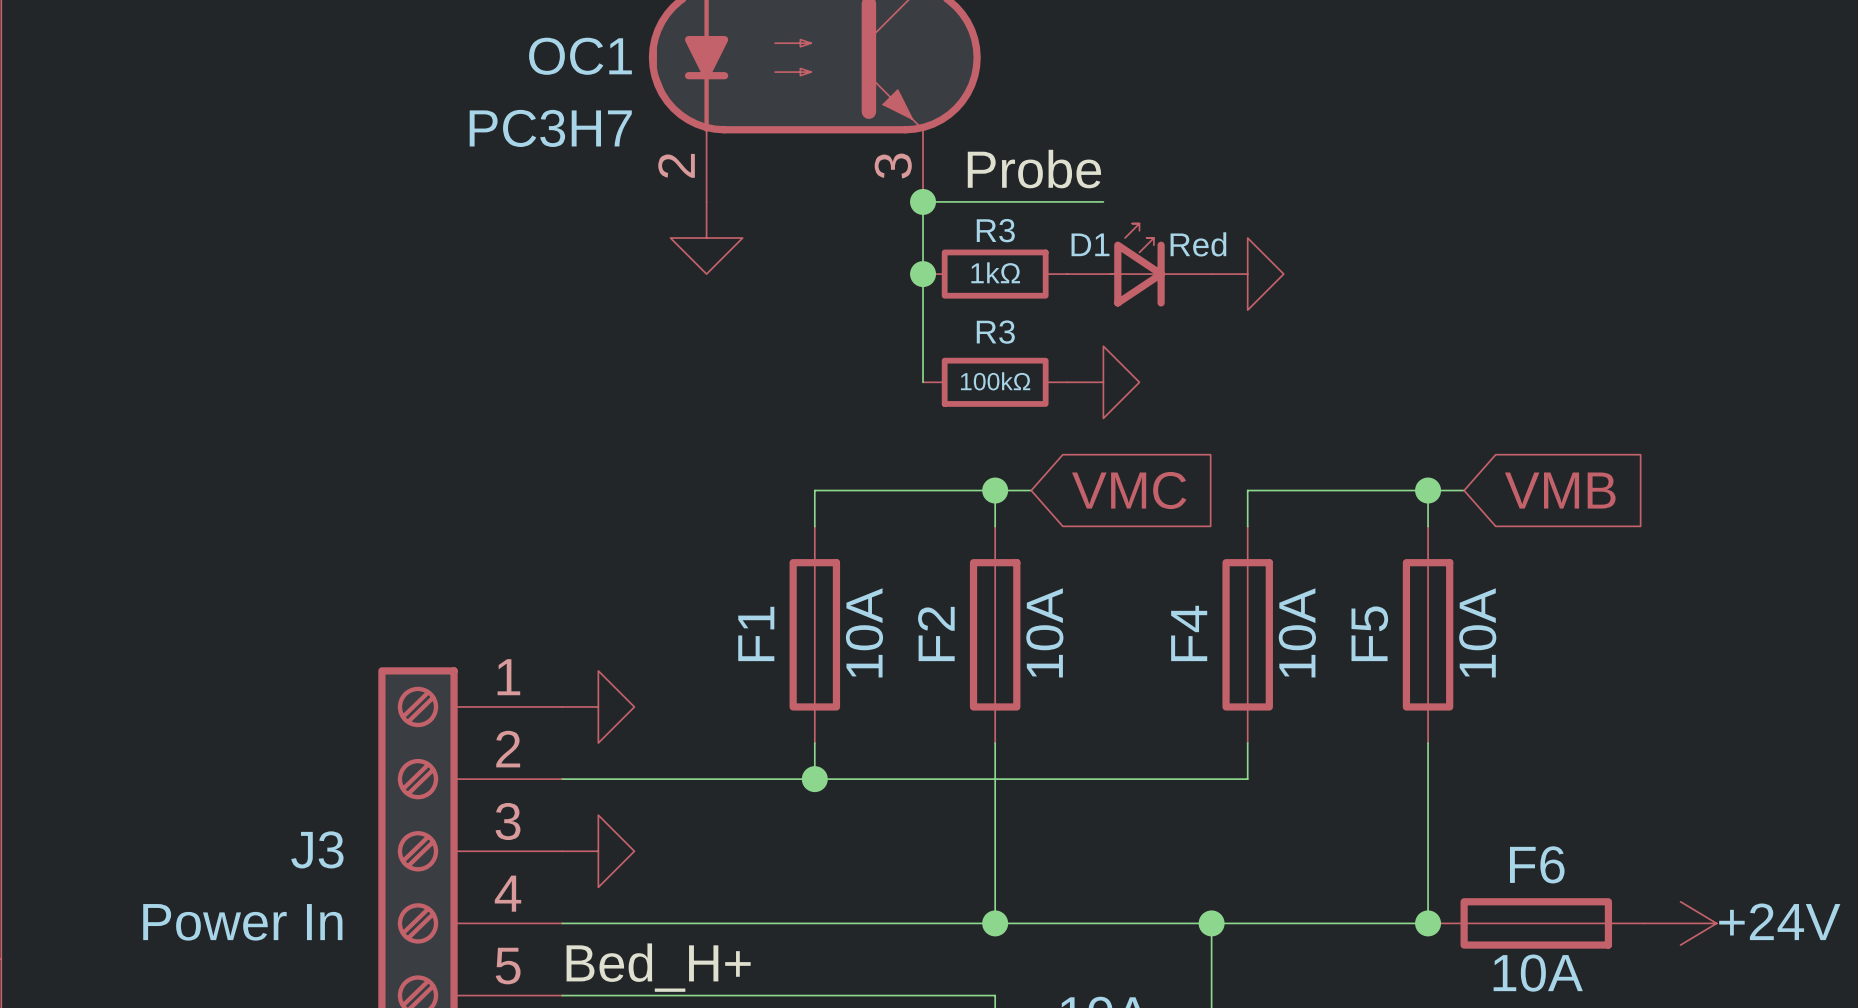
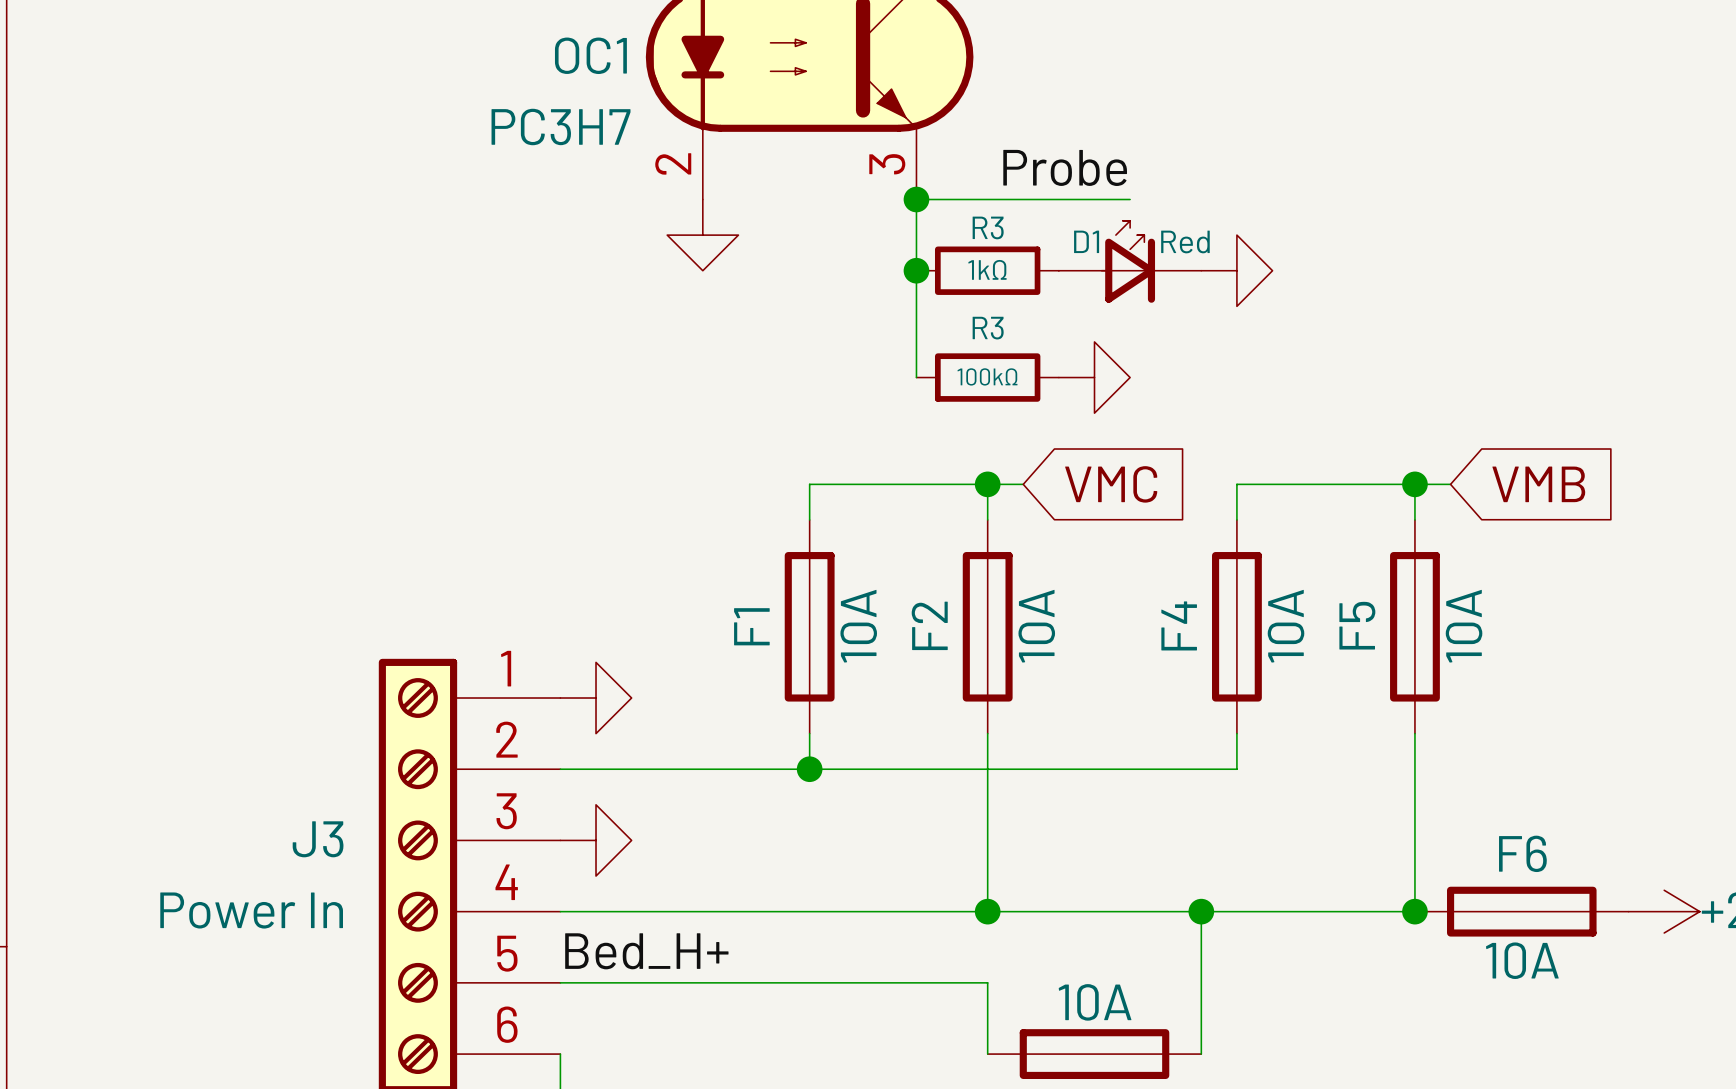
label position: Probe (1034, 169) -> Probe (1065, 167)
wire: none -> (1094, 199) (1130, 199)

